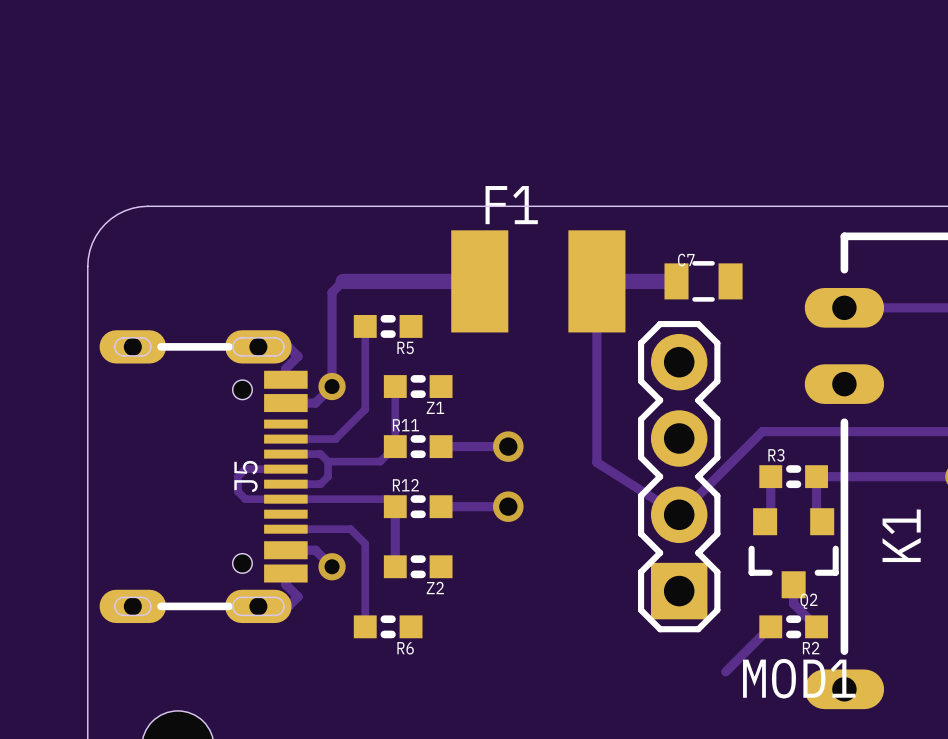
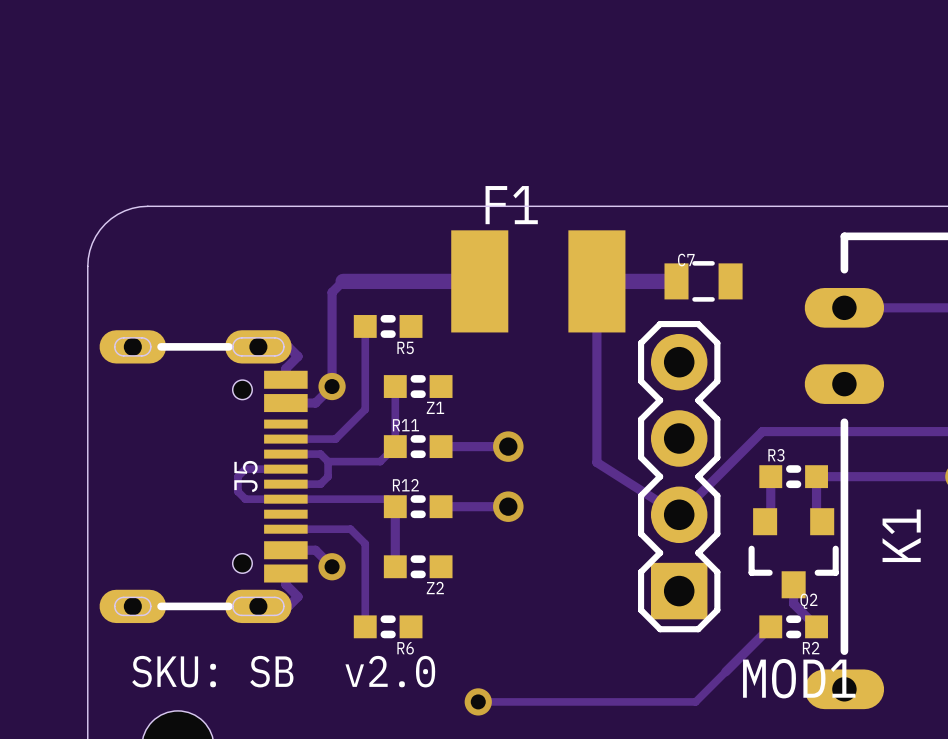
text: none -> SKU: SB v2.0 (283, 671)
track: none -> (725, 671) (695, 701) (478, 701)
via: none -> (478, 701)

